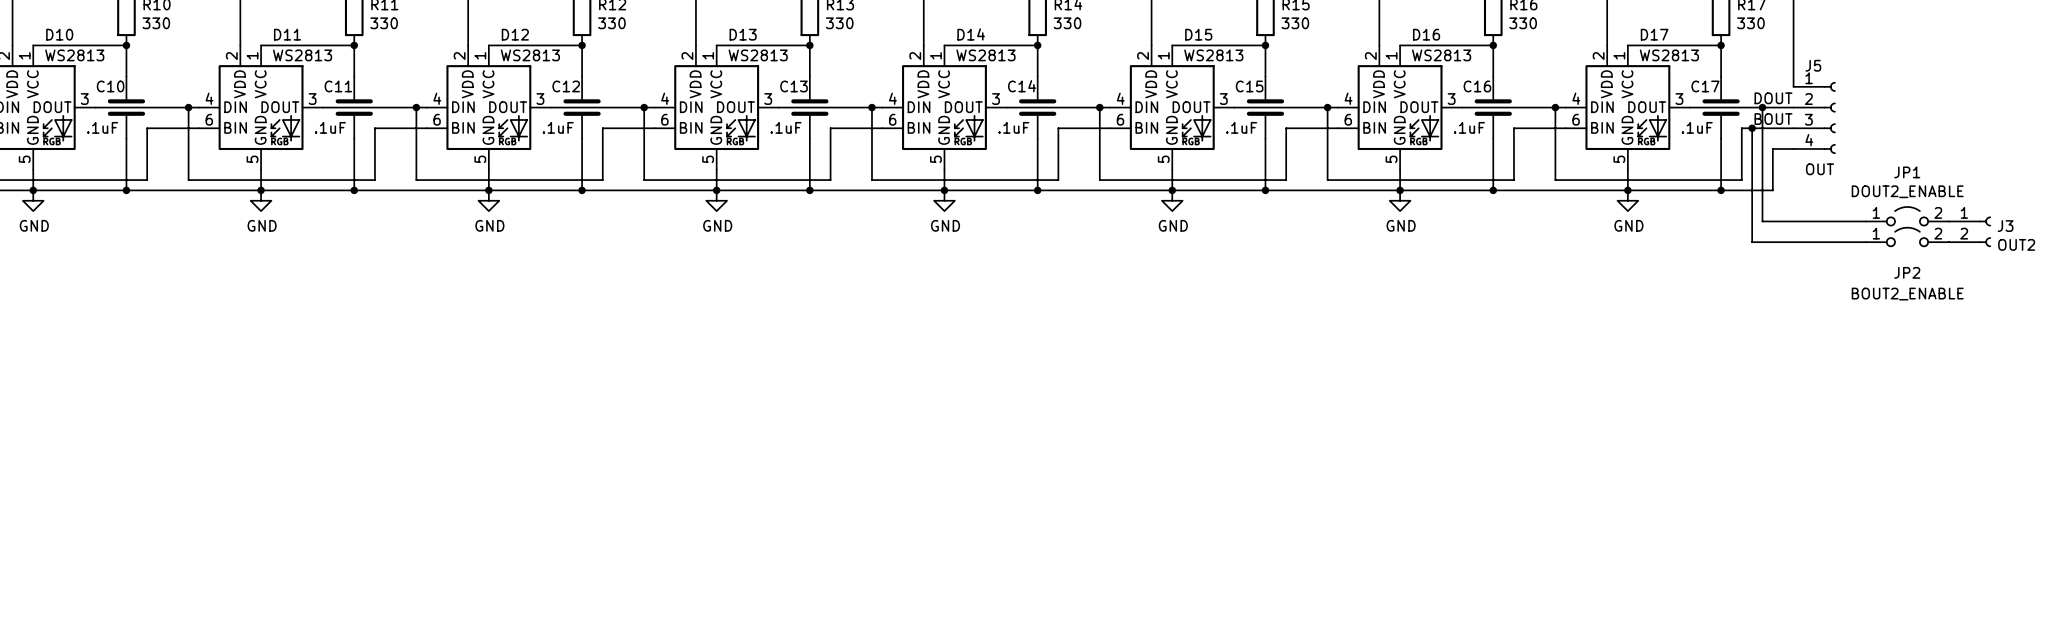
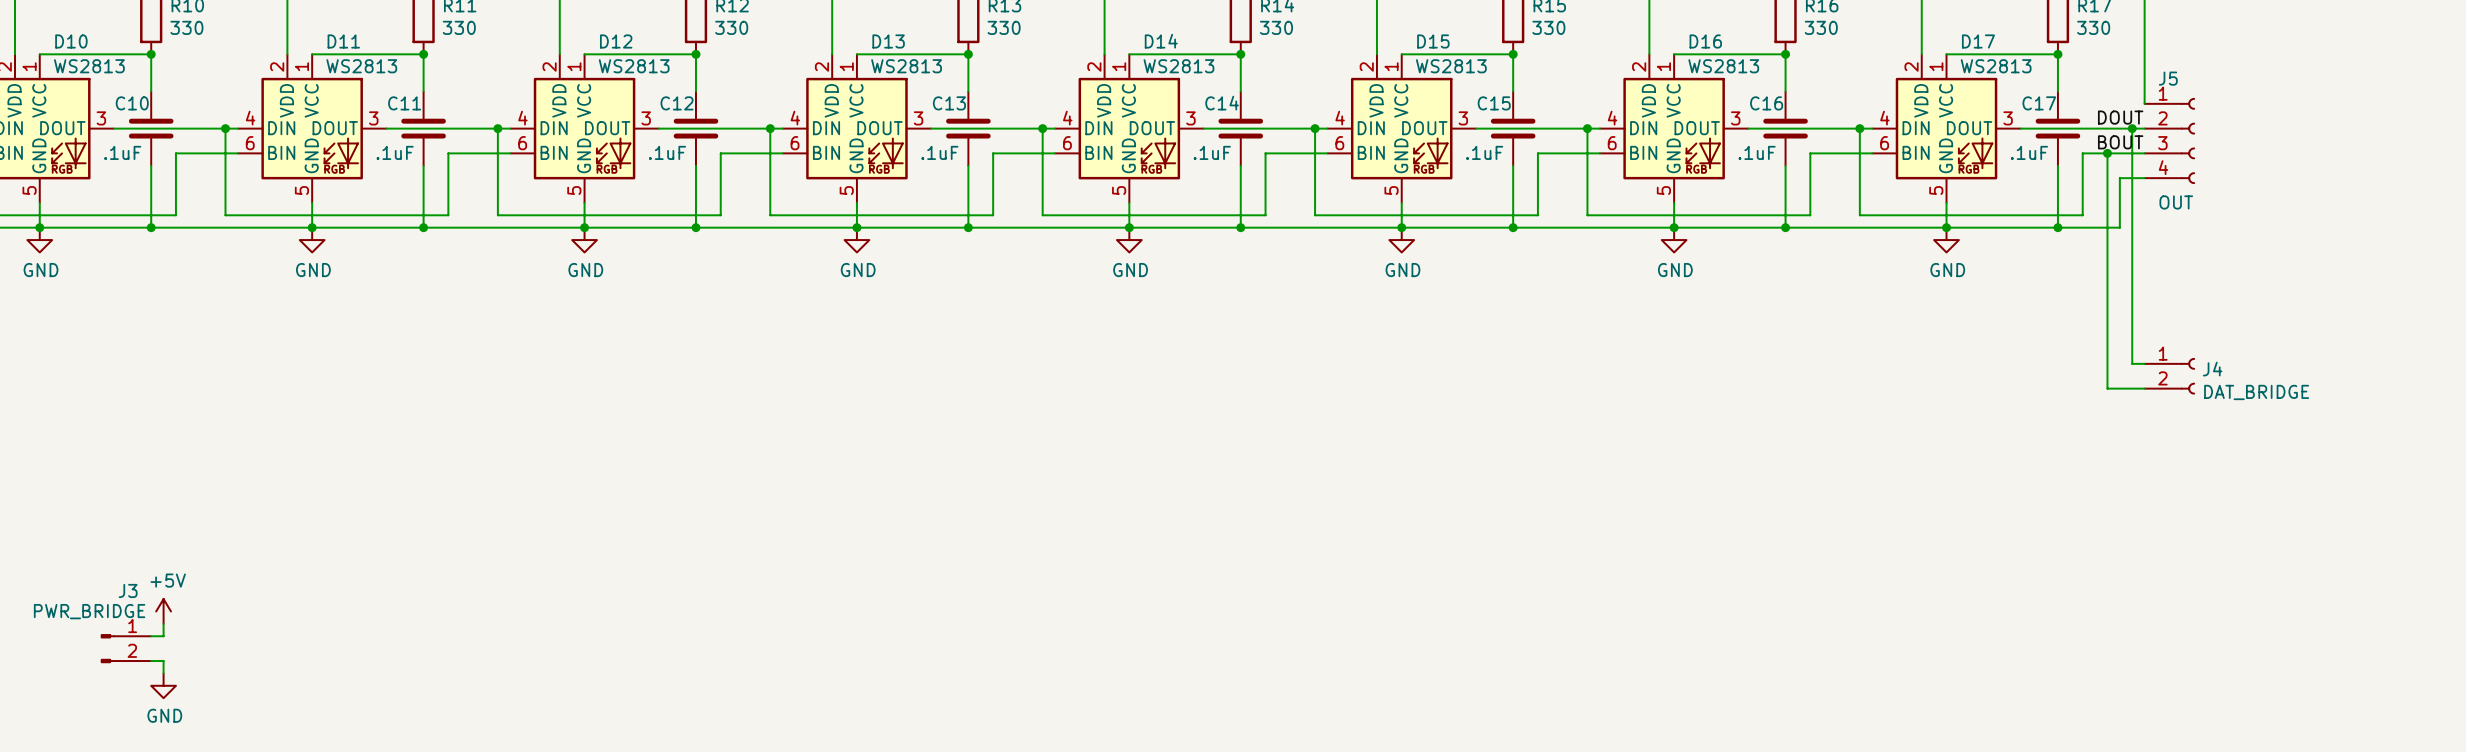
wire: (1762, 107) (1762, 128) -> none
junction: (1762, 107) -> none
wire: none -> (2132, 128) (2132, 363) (2144, 363)
junction: none -> (2132, 128)
wire: (1752, 128) (1752, 242) (1866, 242) -> none
junction: (1752, 128) -> none
junction: none -> (2107, 153)
JP1: DOUT2_ENABLE (1907, 216) -> none
J3 symbol: [1948, 216, 1991, 247] -> [100, 634, 152, 664]
wire: (1762, 221) (1866, 221) -> (2107, 264) (2107, 388) (2144, 388)
J3 name position: J3 (2005, 226) -> J3 (128, 590)
JP2: BOUT2_ENABLE (1907, 237) -> none
J3 value: OUT2 (2016, 244) -> PWR_BRIDGE (89, 611)
J4: none -> DAT_BRIDGE (2169, 376)
power symbol: none -> +5V (163, 611)
wire: none -> (163, 623) (163, 636) (151, 636)
wire: none -> (151, 661) (163, 661) (163, 673)
power symbol: none -> GND (163, 685)

